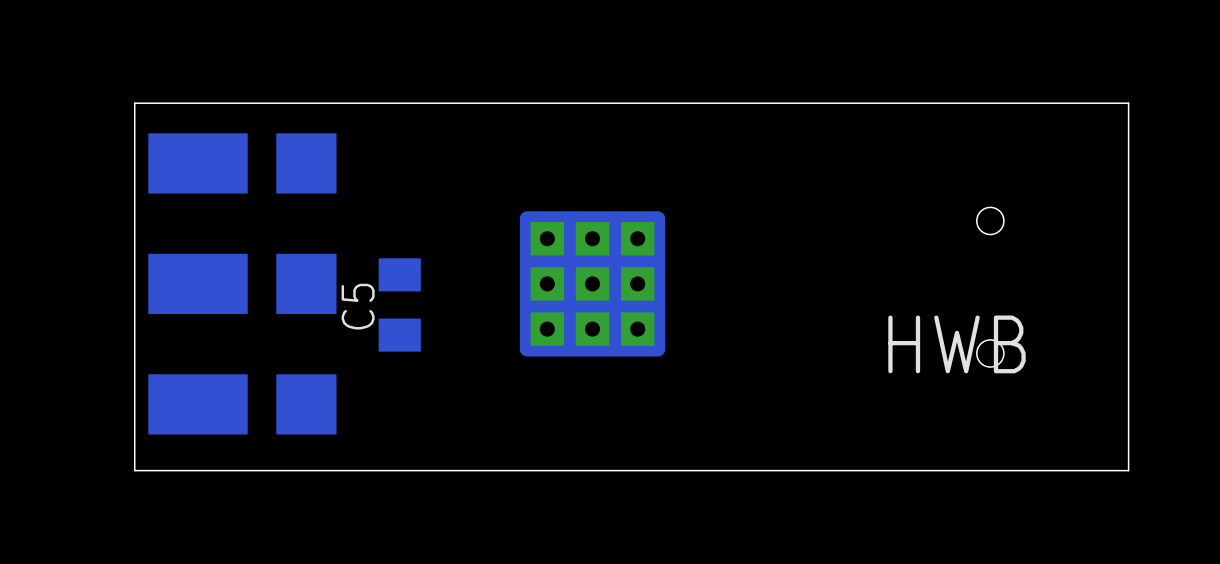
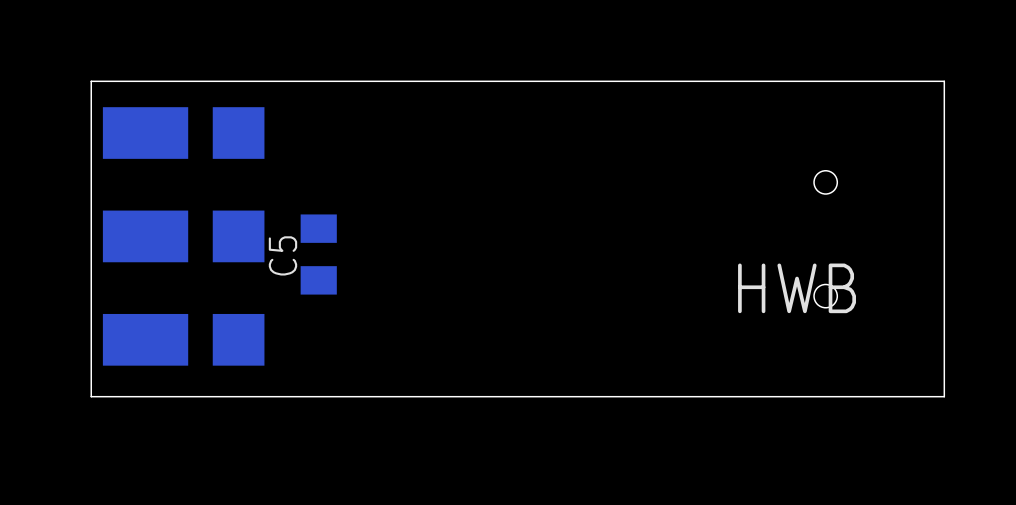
part: (592, 283) -> none

